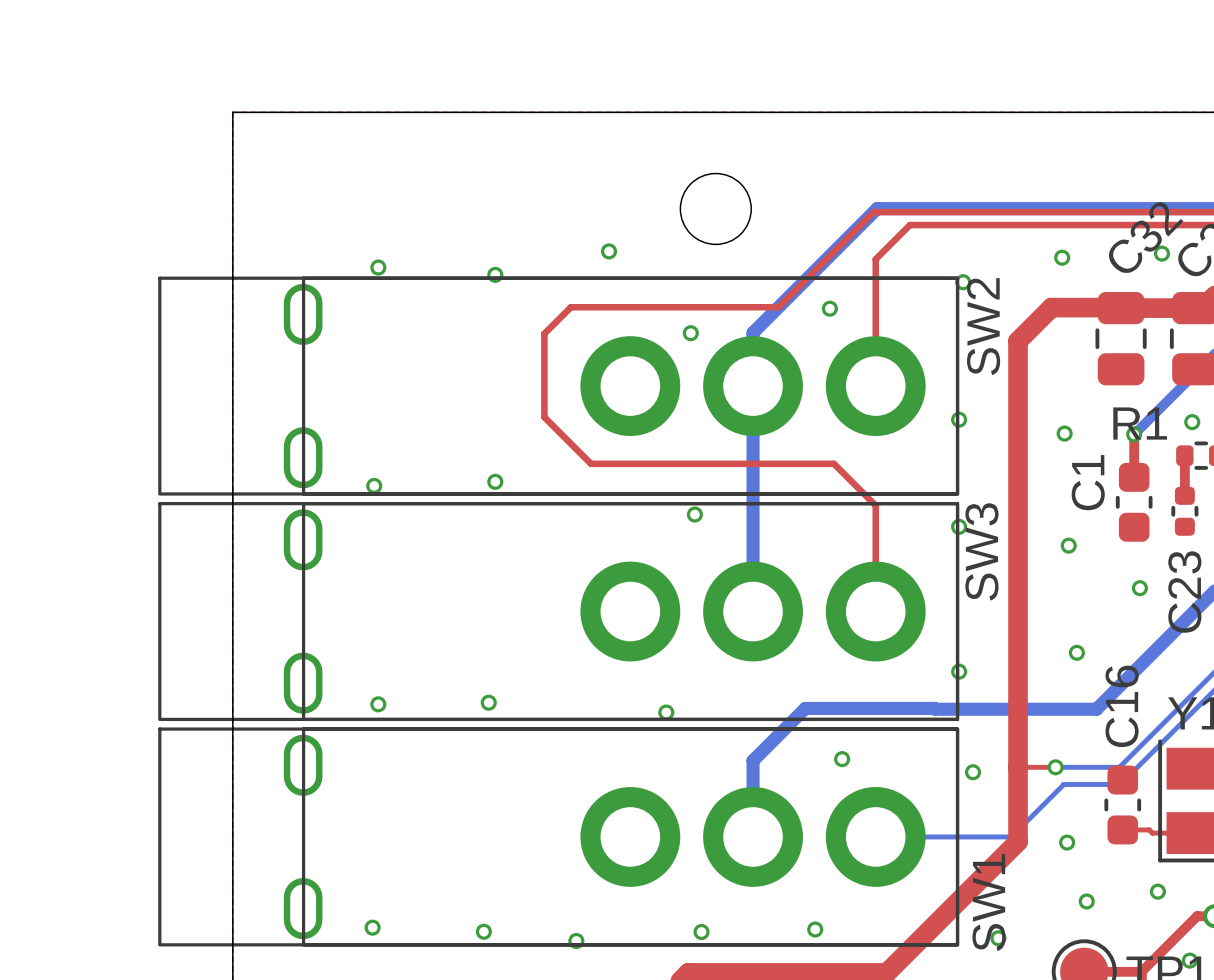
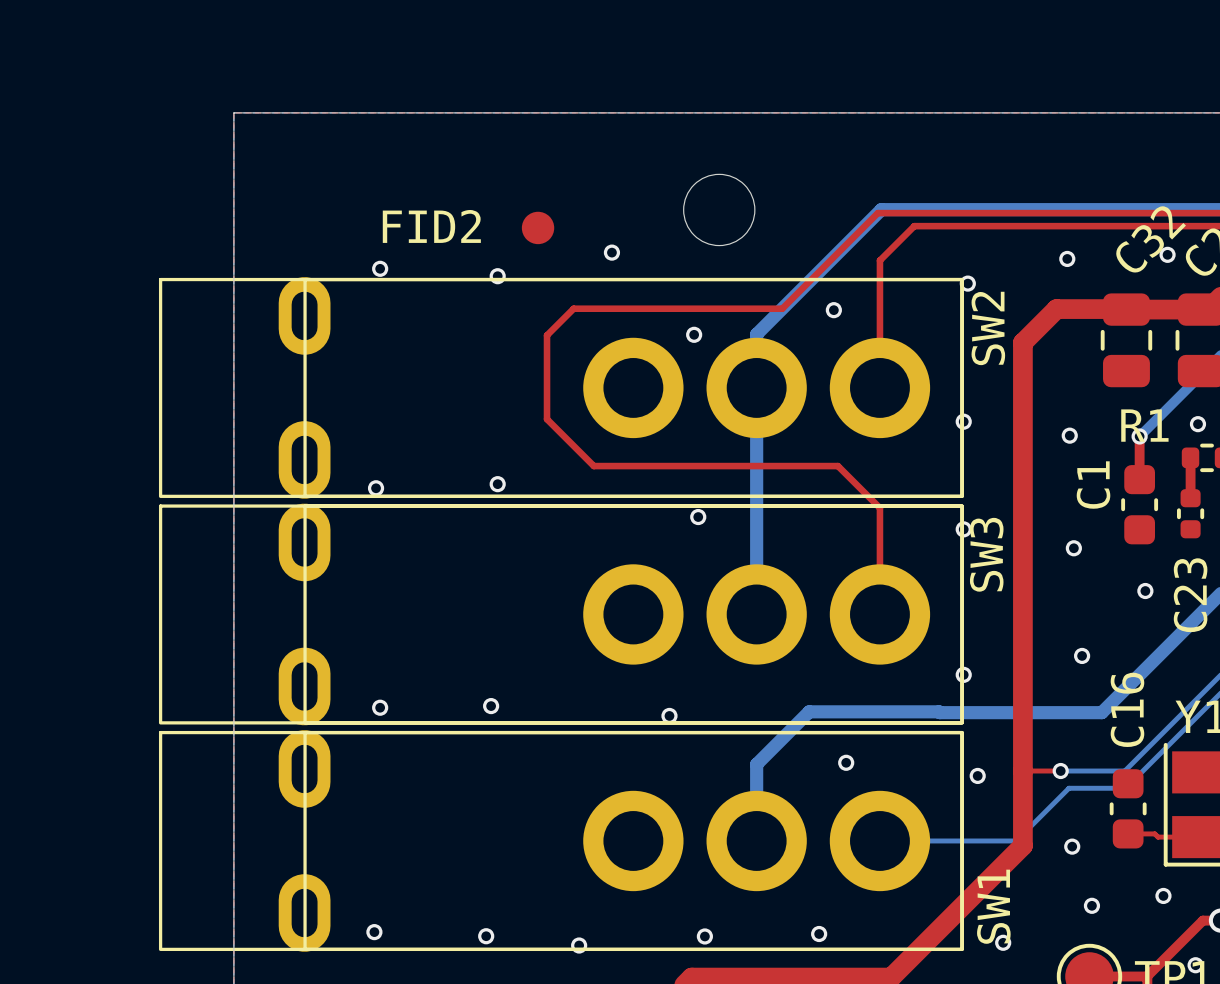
FID2: none -> (538, 227)
SW2 footprint: [158, 276, 960, 496] -> [158, 277, 964, 499]
SW3 footprint: [158, 502, 960, 722] -> [158, 503, 964, 726]
SW1 footprint: [158, 727, 960, 947] -> [158, 730, 964, 952]

